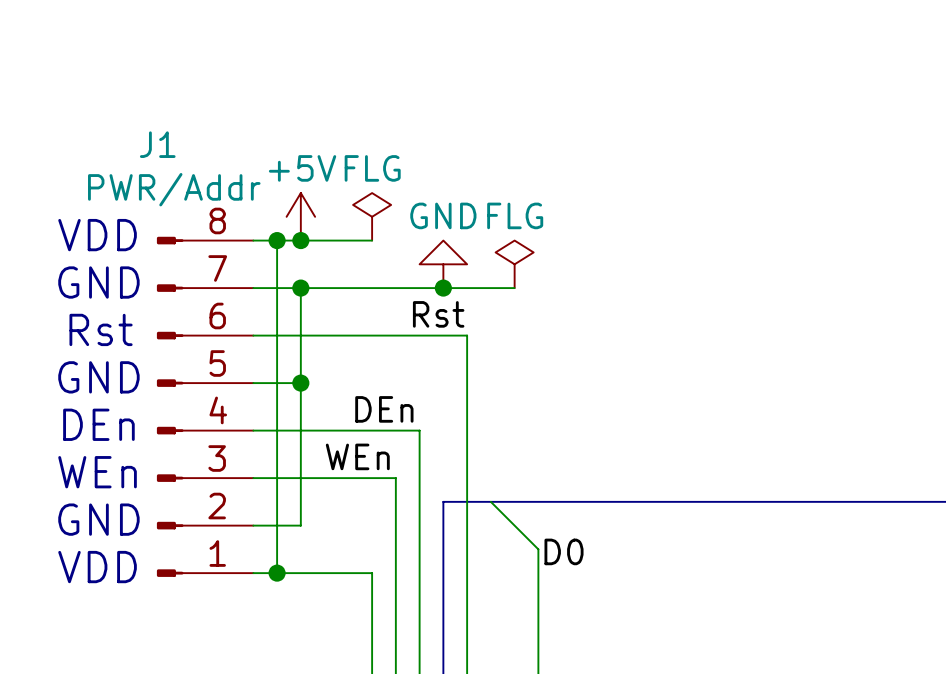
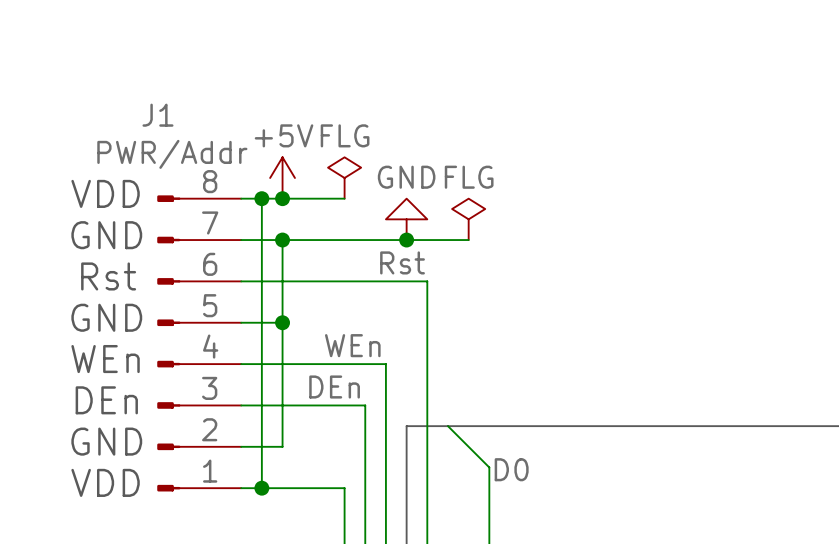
label: DEn (384, 409) -> WEn (352, 345)
text: DEn (98, 424) -> WEn (105, 359)
label: WEn (357, 456) -> DEn (334, 387)
text: WEn (97, 472) -> DEn (106, 400)

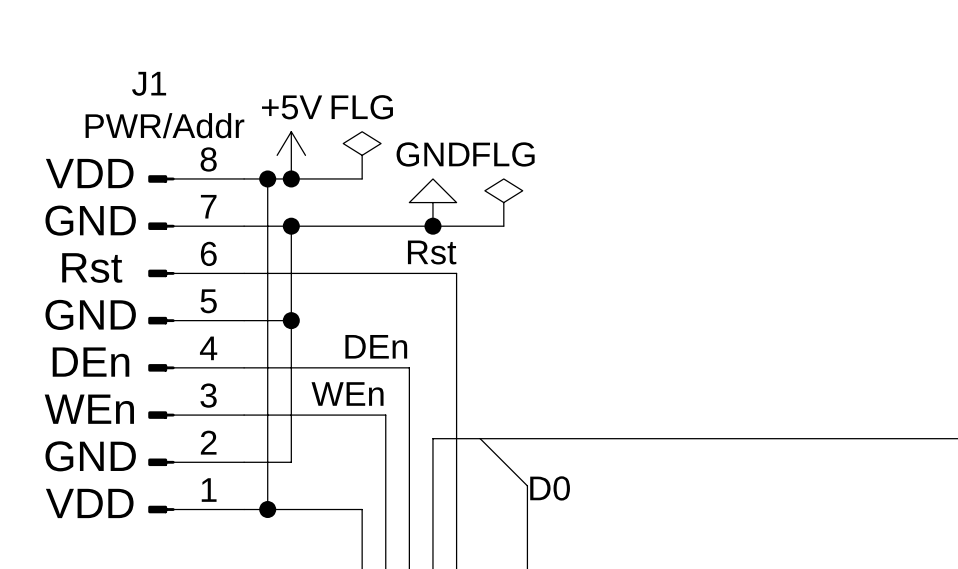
label: WEn (352, 345) -> DEn (376, 346)
text: WEn (105, 359) -> DEn (91, 362)
label: DEn (334, 387) -> WEn (347, 394)
text: DEn (106, 400) -> WEn (89, 409)

